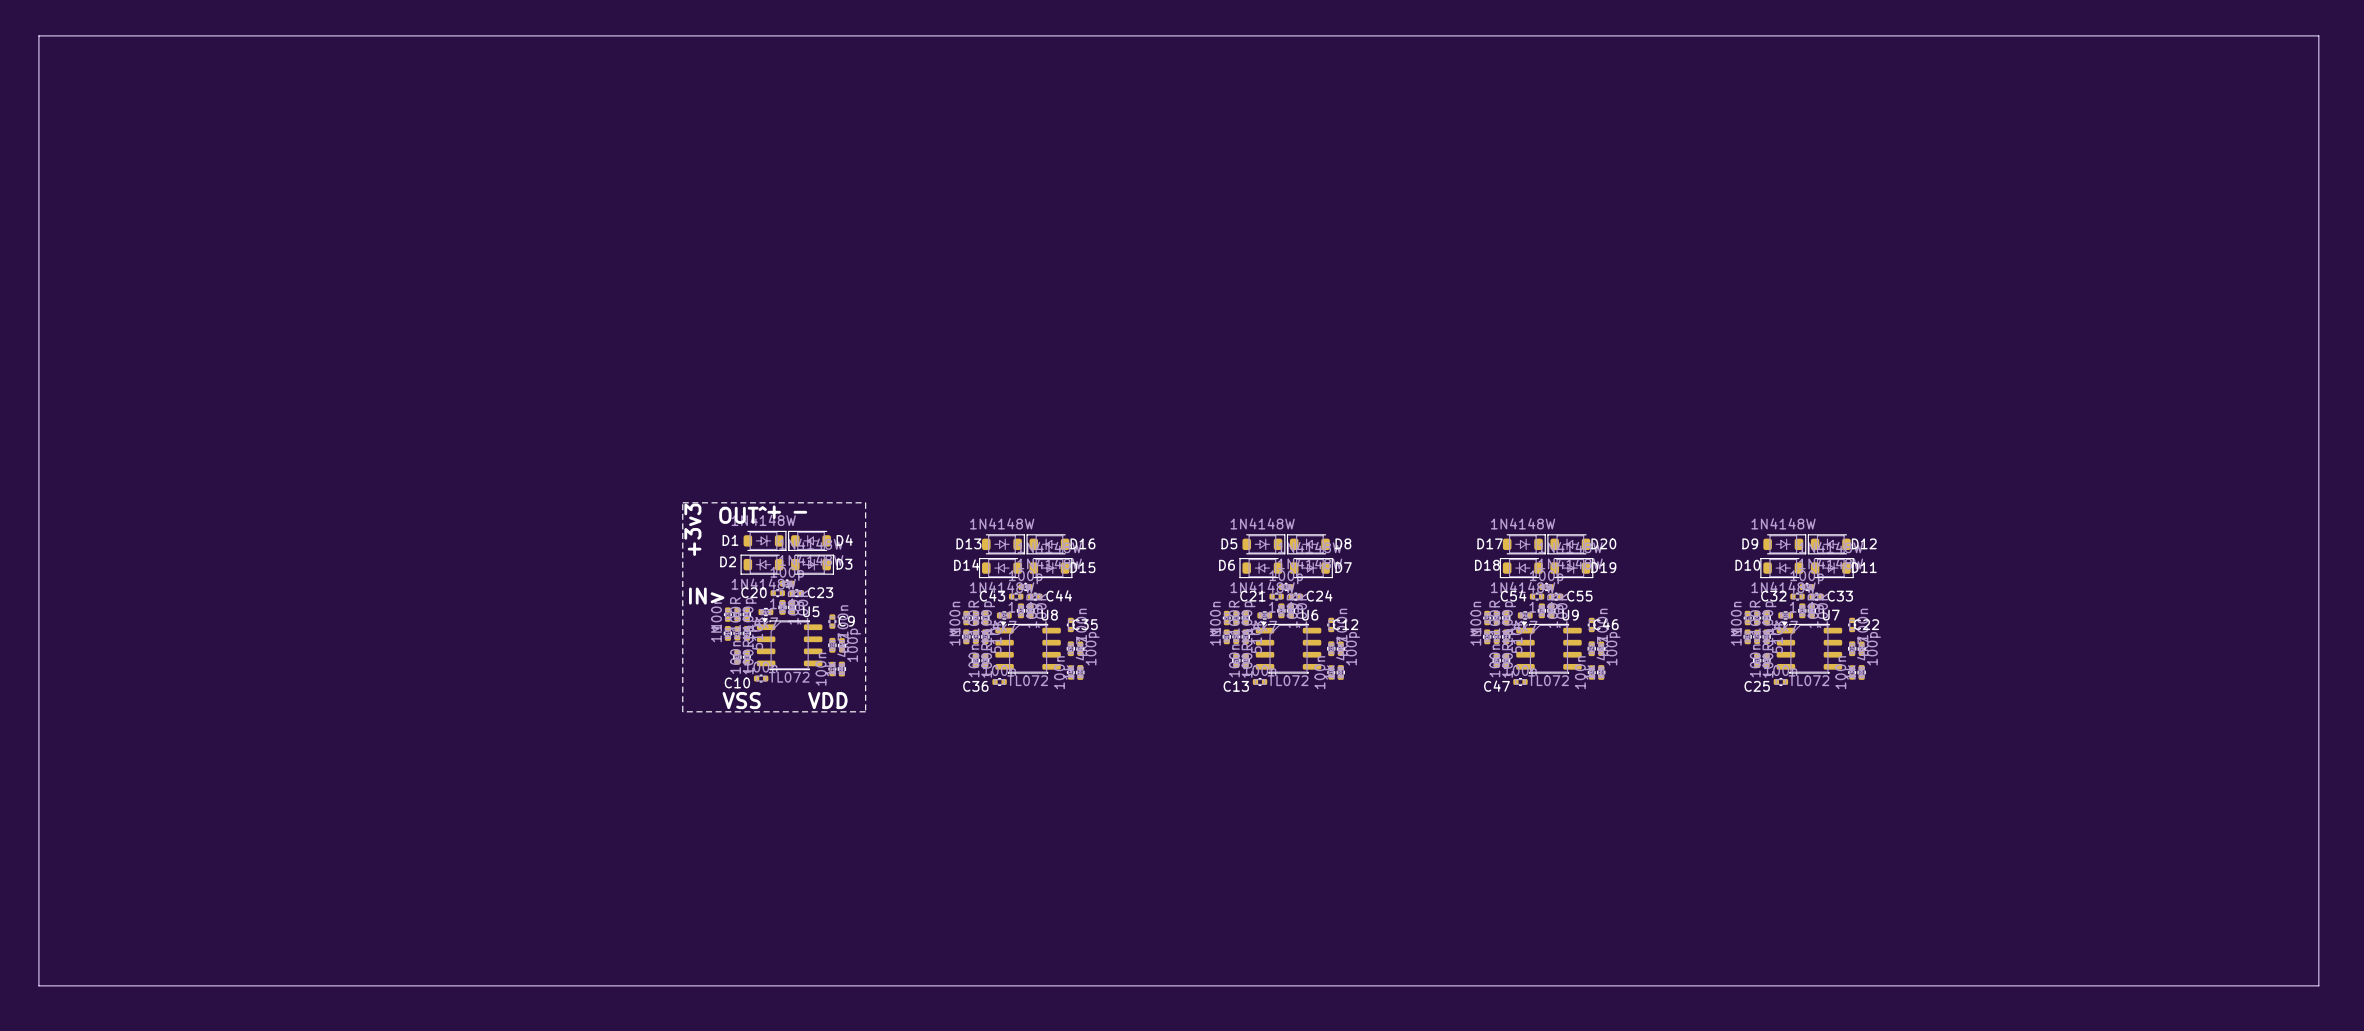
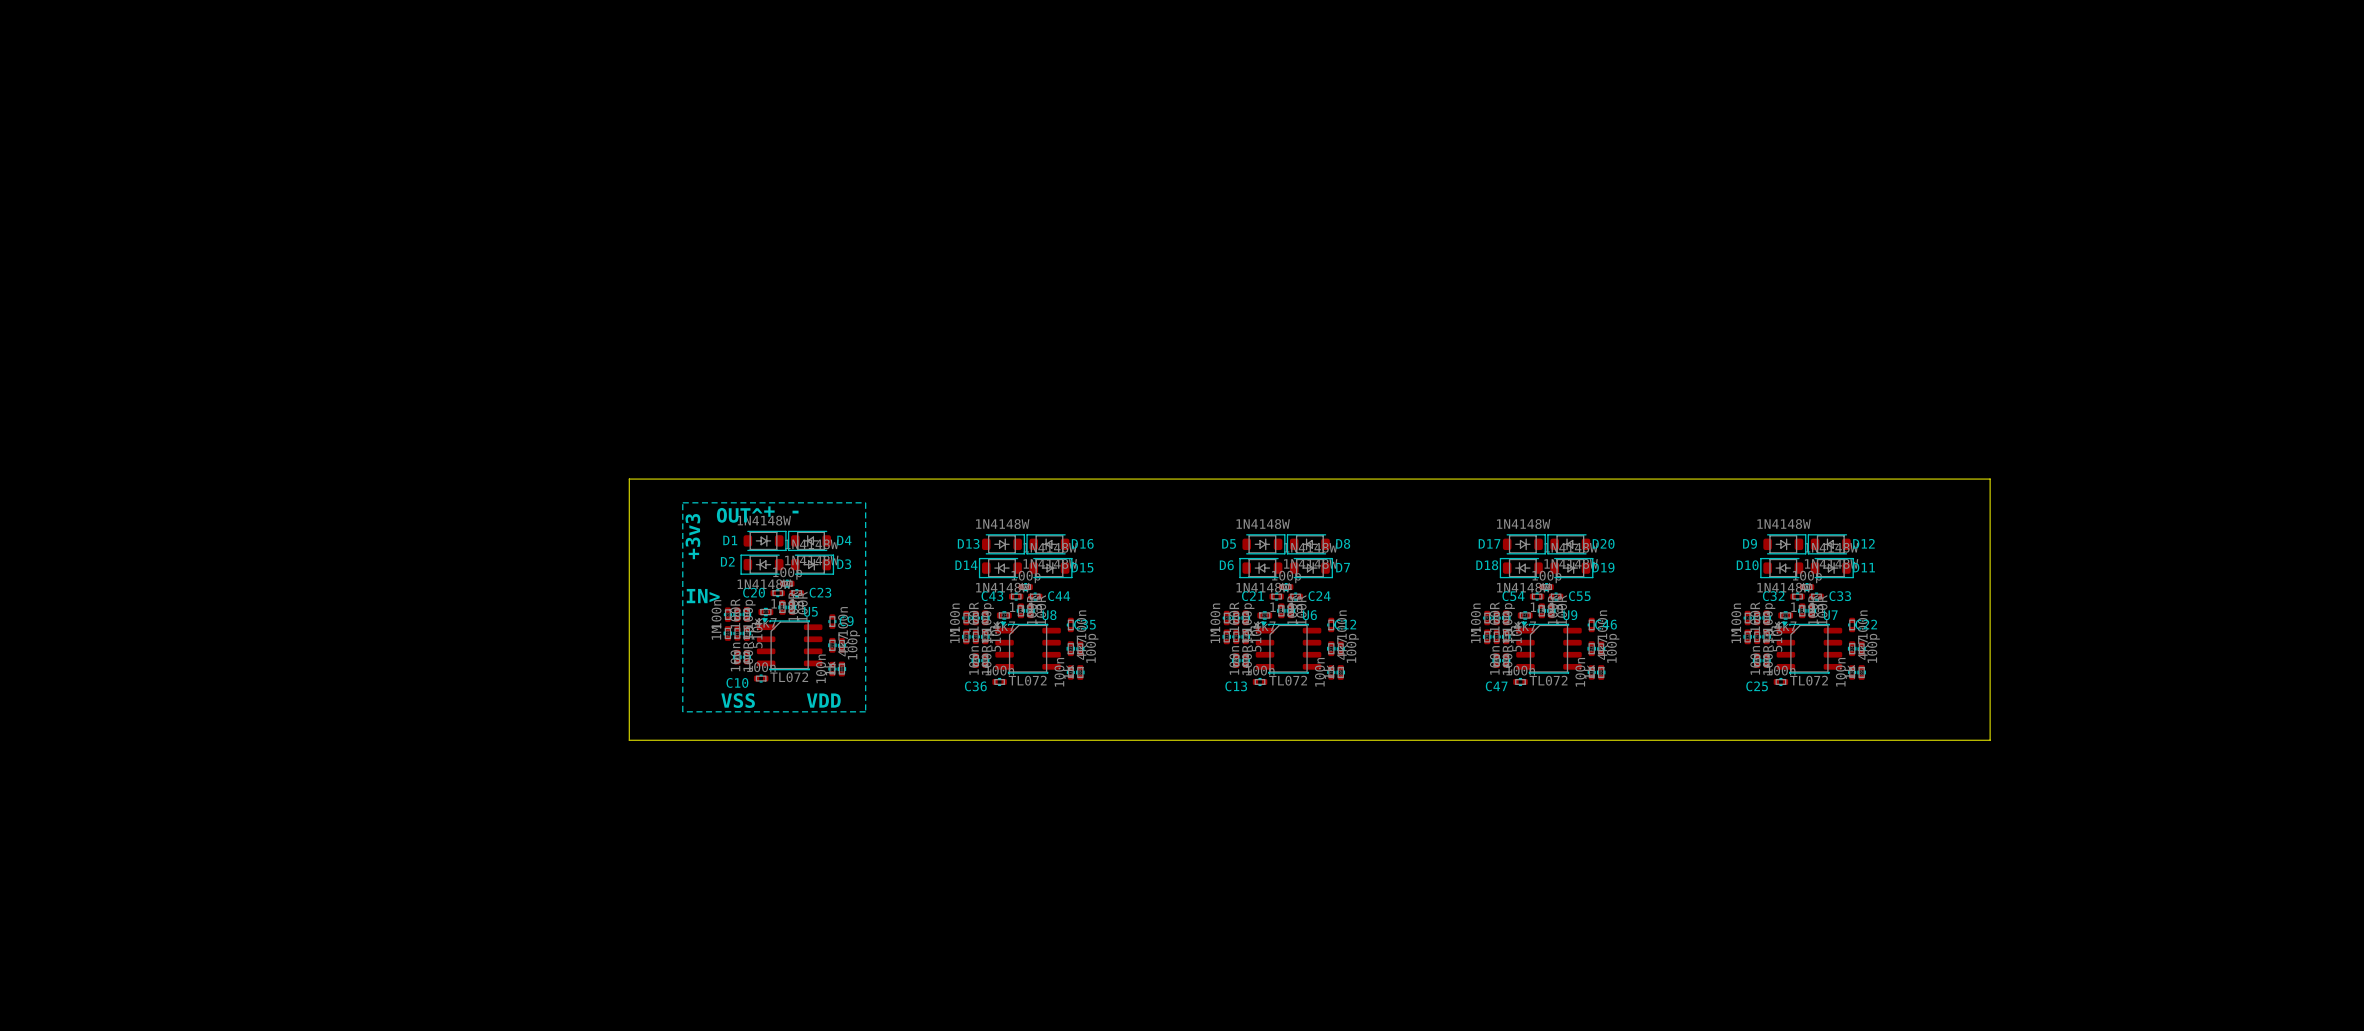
board edge: (38, 35) (2318, 35) (2318, 985) (38, 985) (38, 35) -> none
board edge: none -> (629, 479) (1990, 479) (1990, 740) (629, 740) (629, 479)

